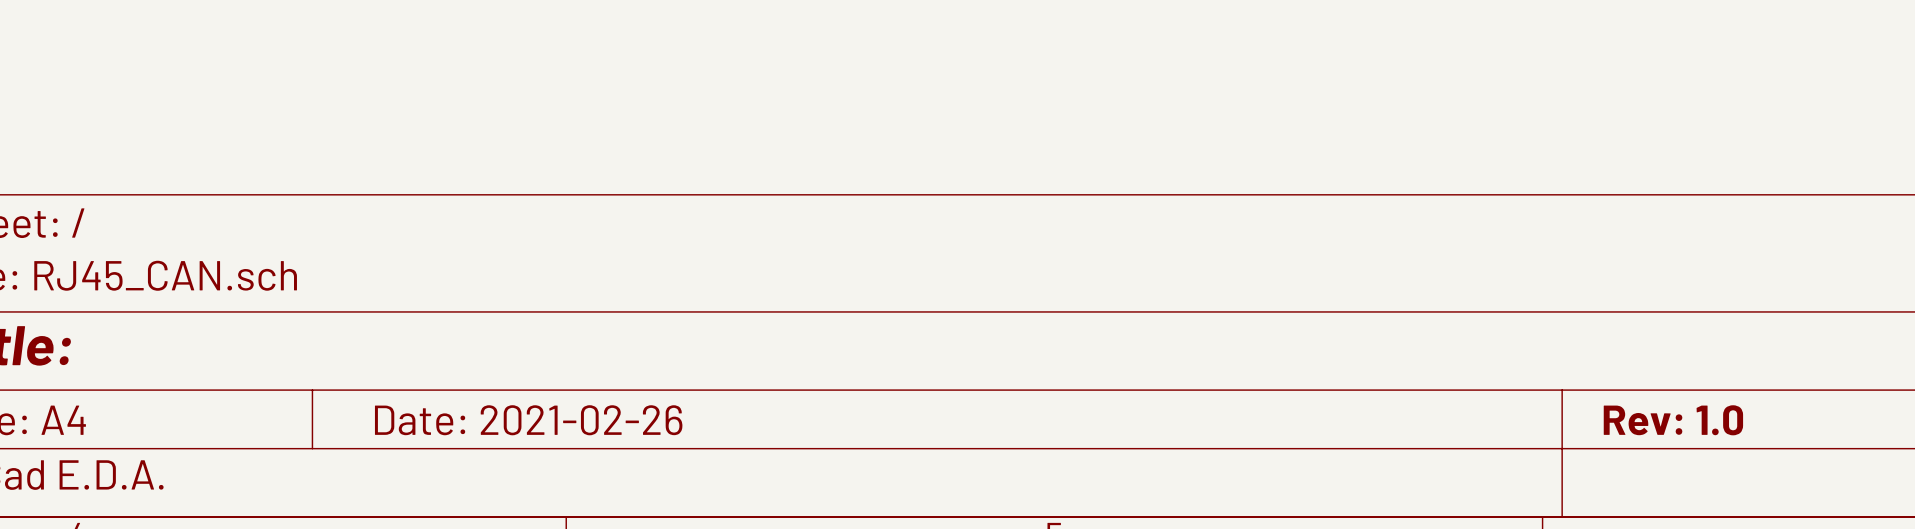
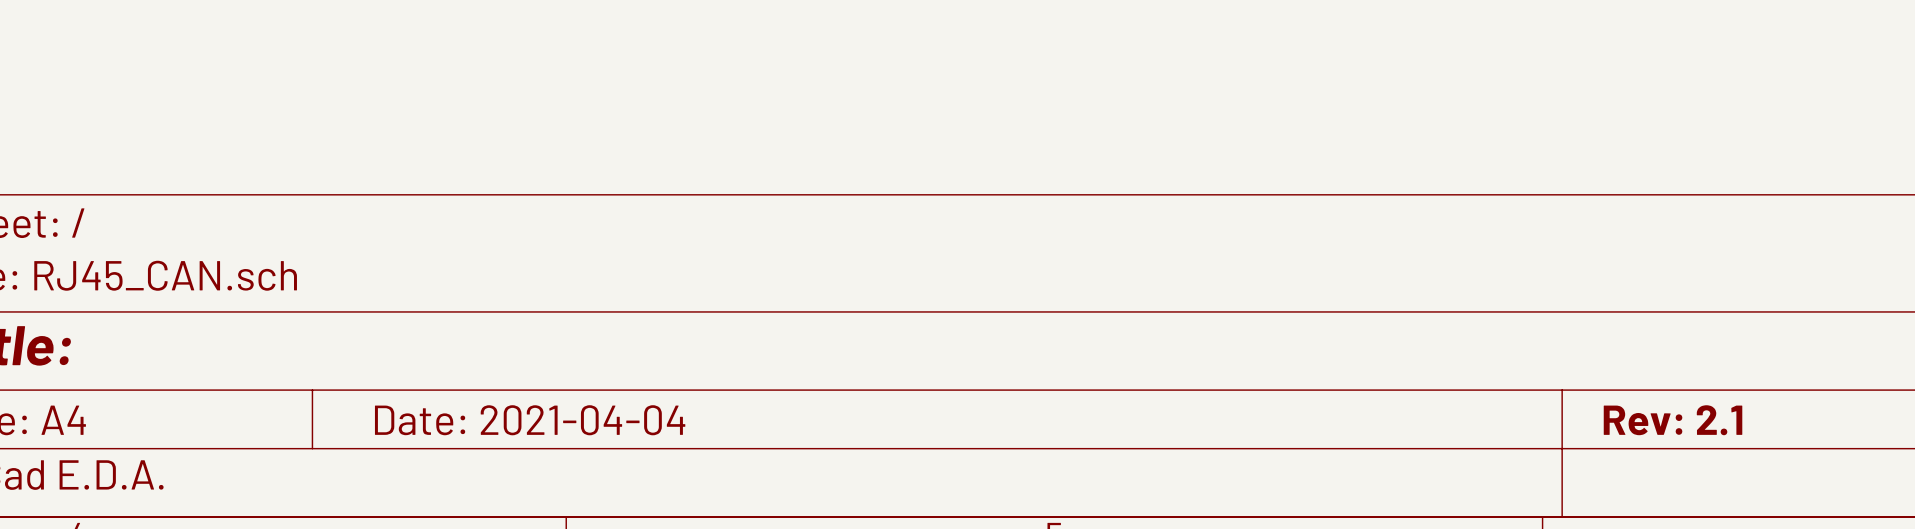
title block: Date: 2021-02-26 (528, 420) -> Date: 2021-04-04 (530, 420)
title block: Rev: 1.0 (1673, 420) -> Rev: 2.1 (1673, 420)

